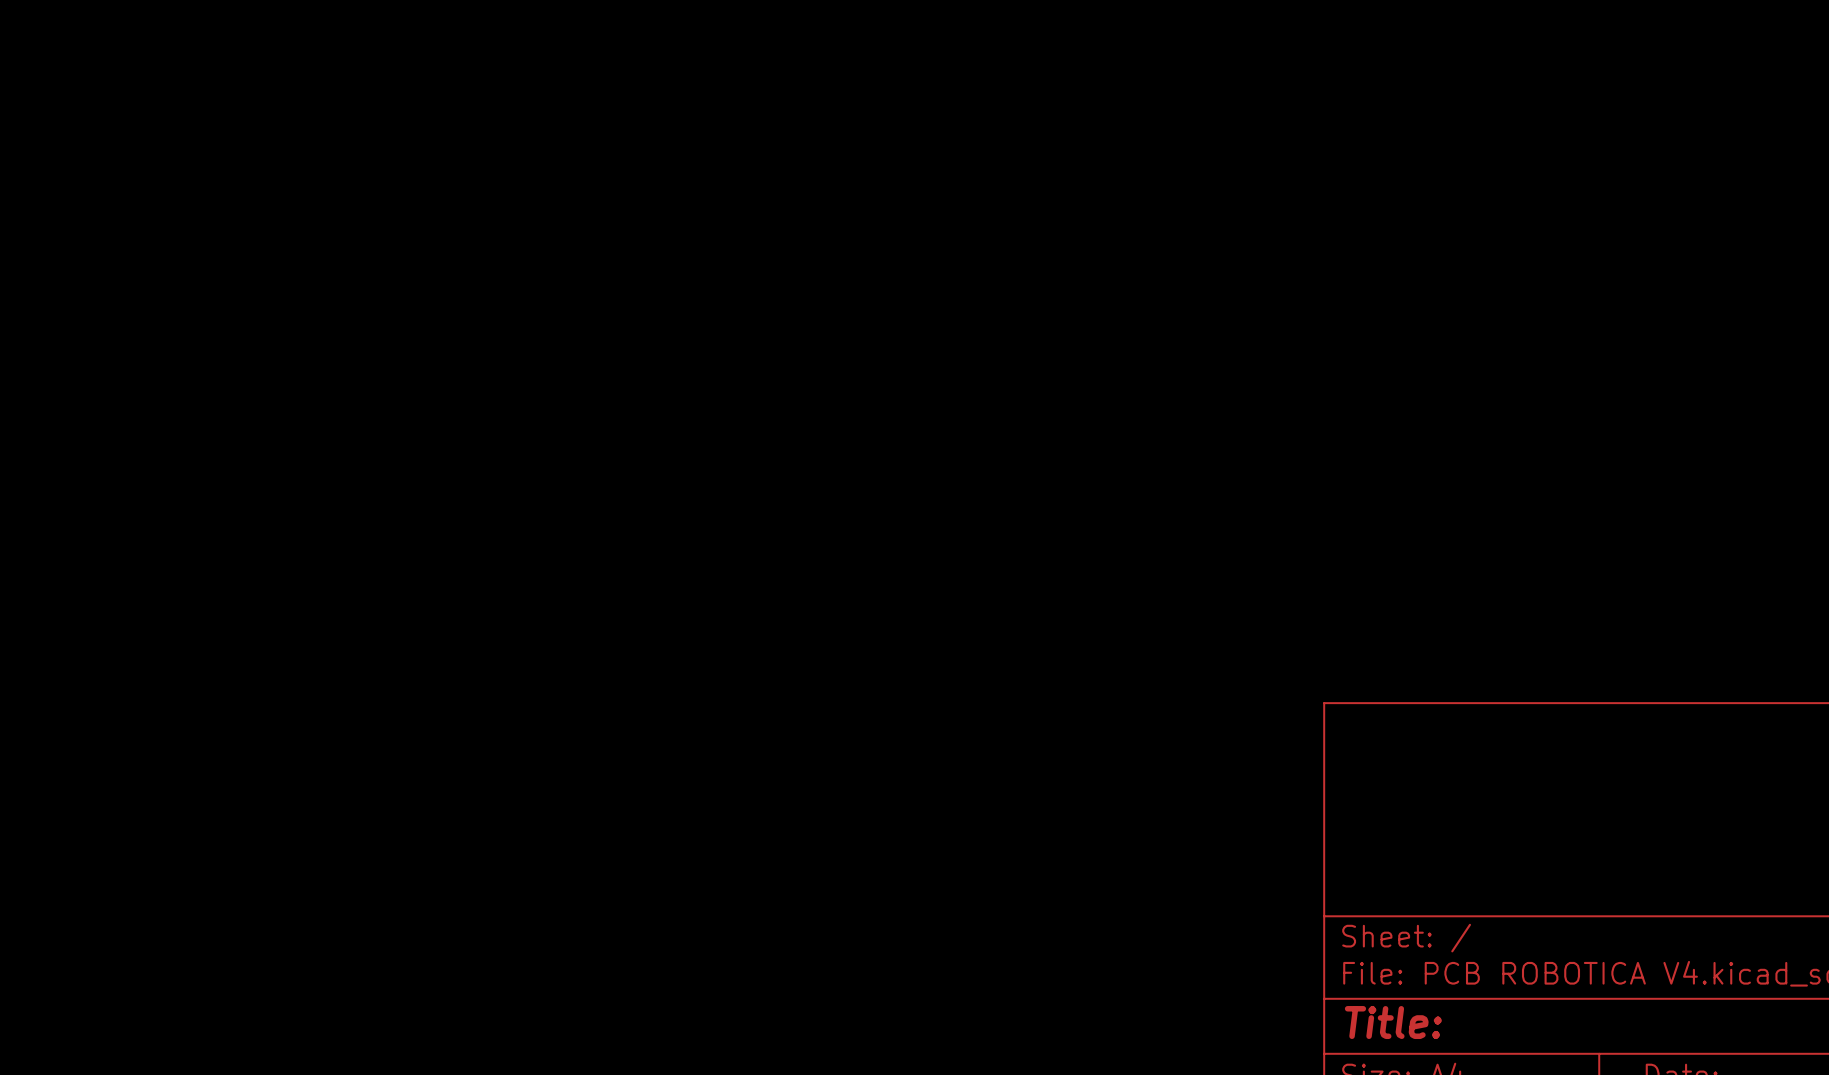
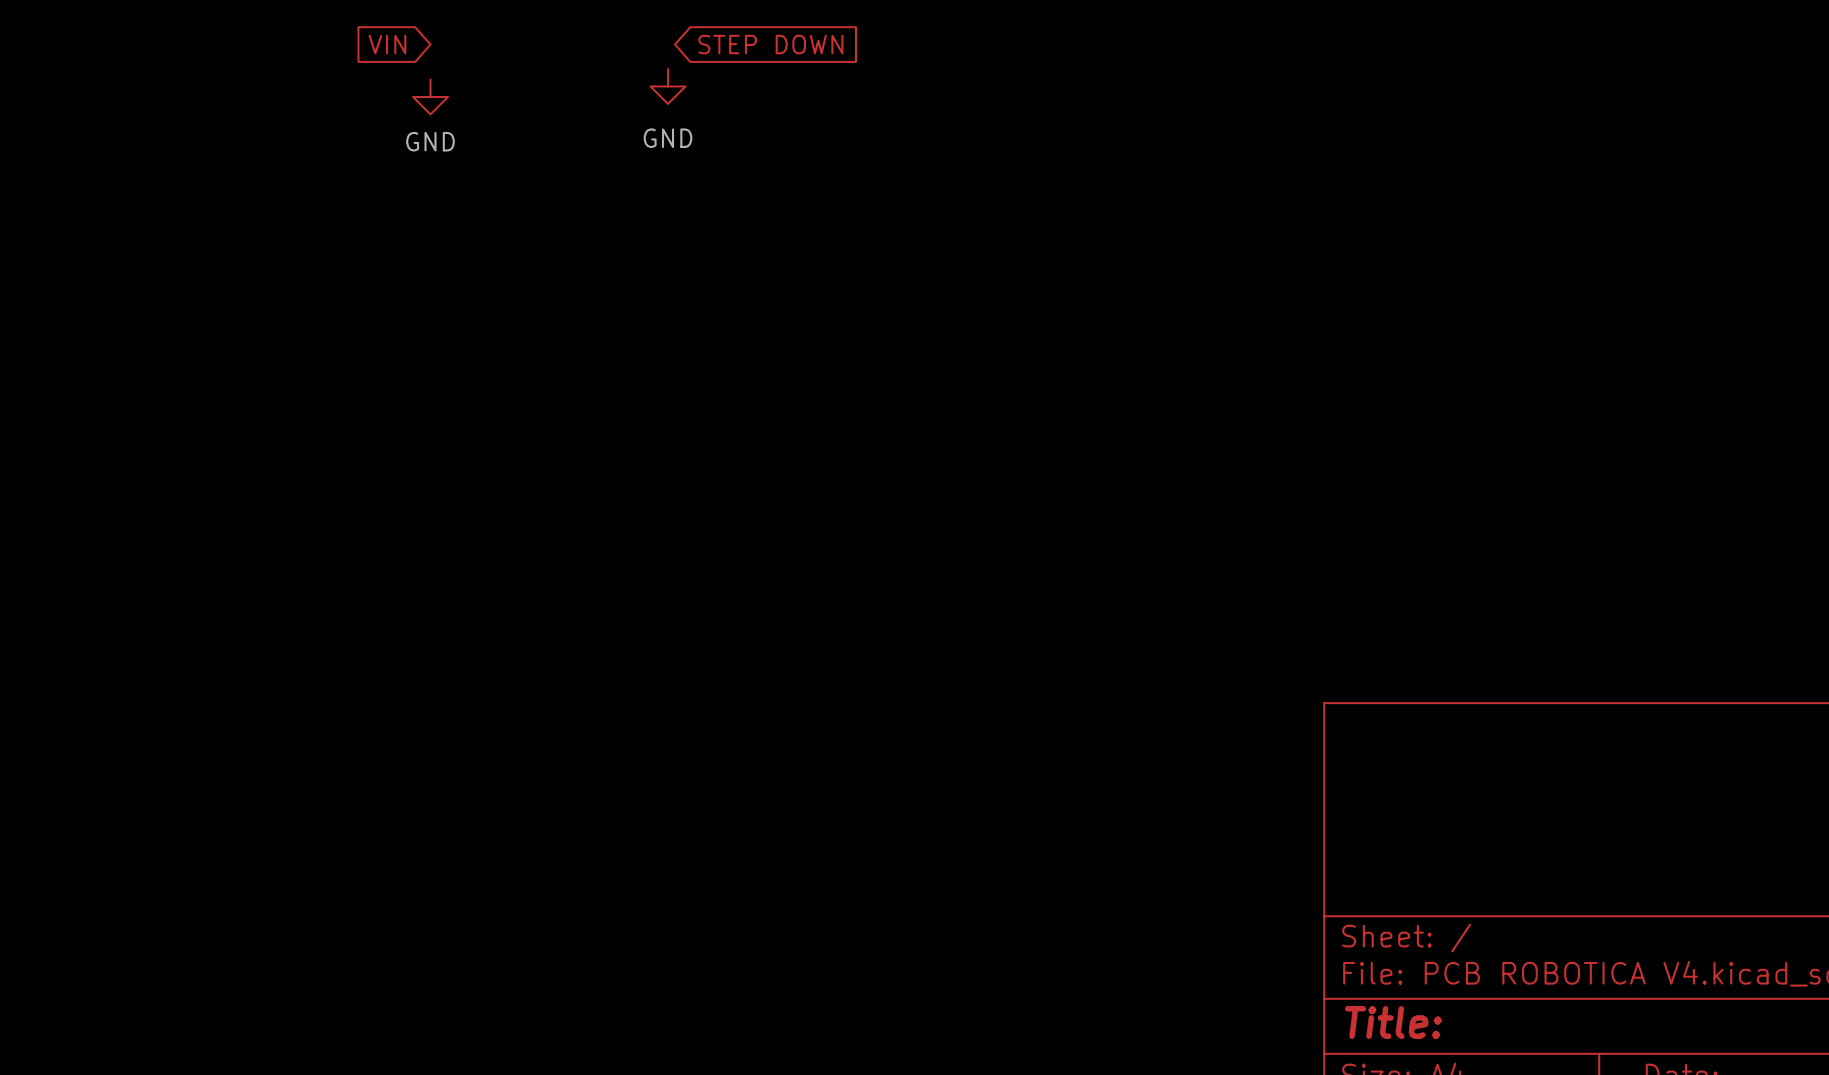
global label: none -> VIN (387, 44)
global label: none -> STEP DOWN (770, 44)
power symbol: none -> GND (668, 86)
power symbol: none -> GND (430, 96)

